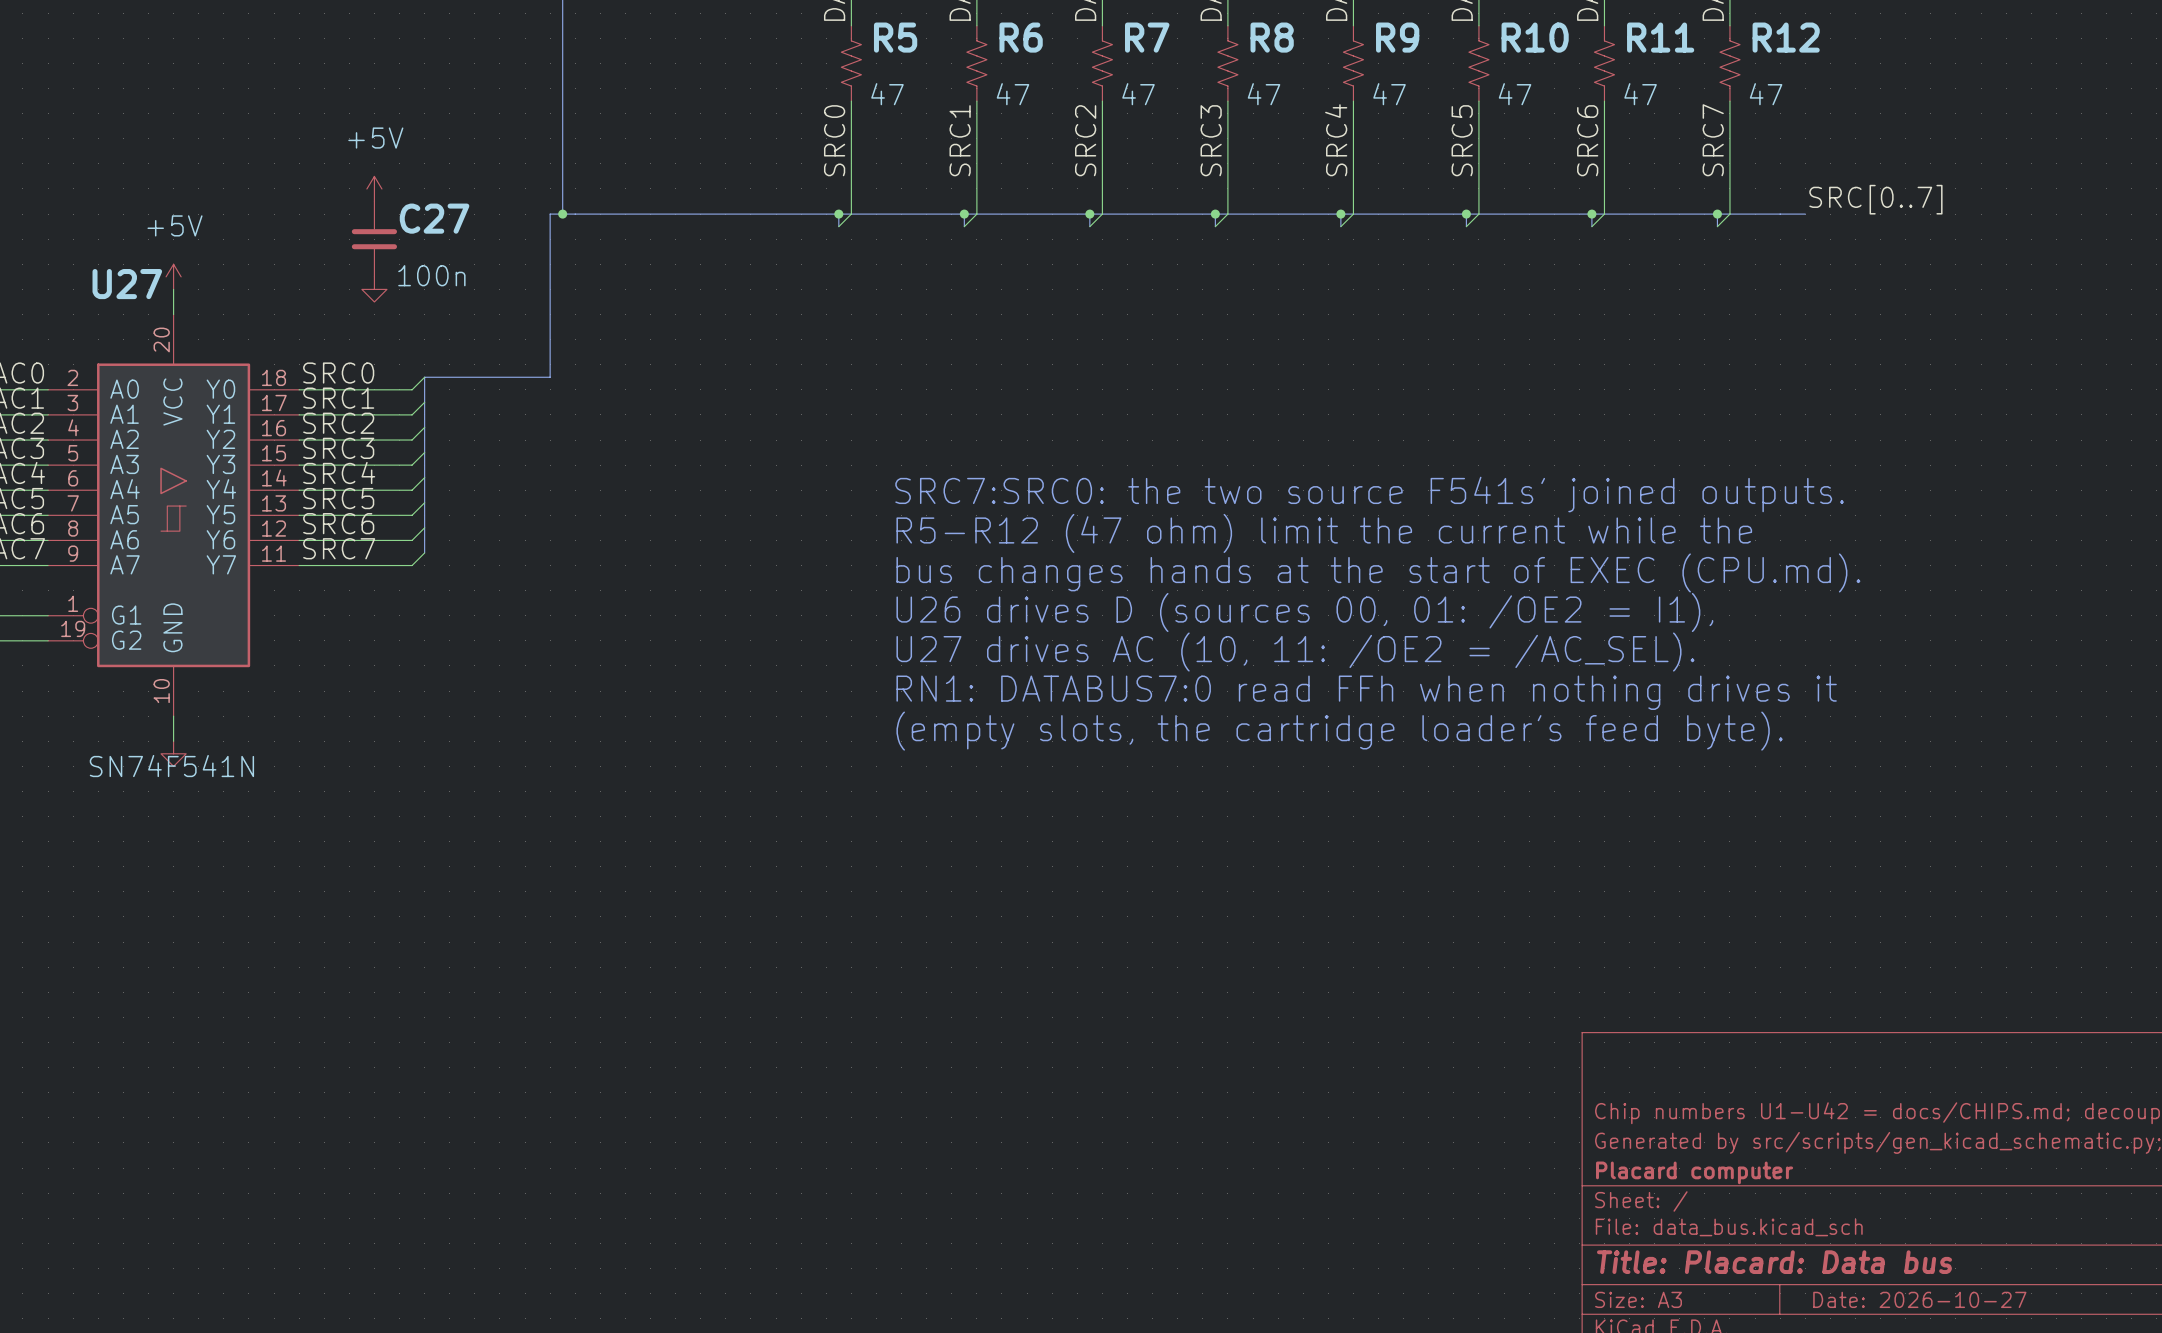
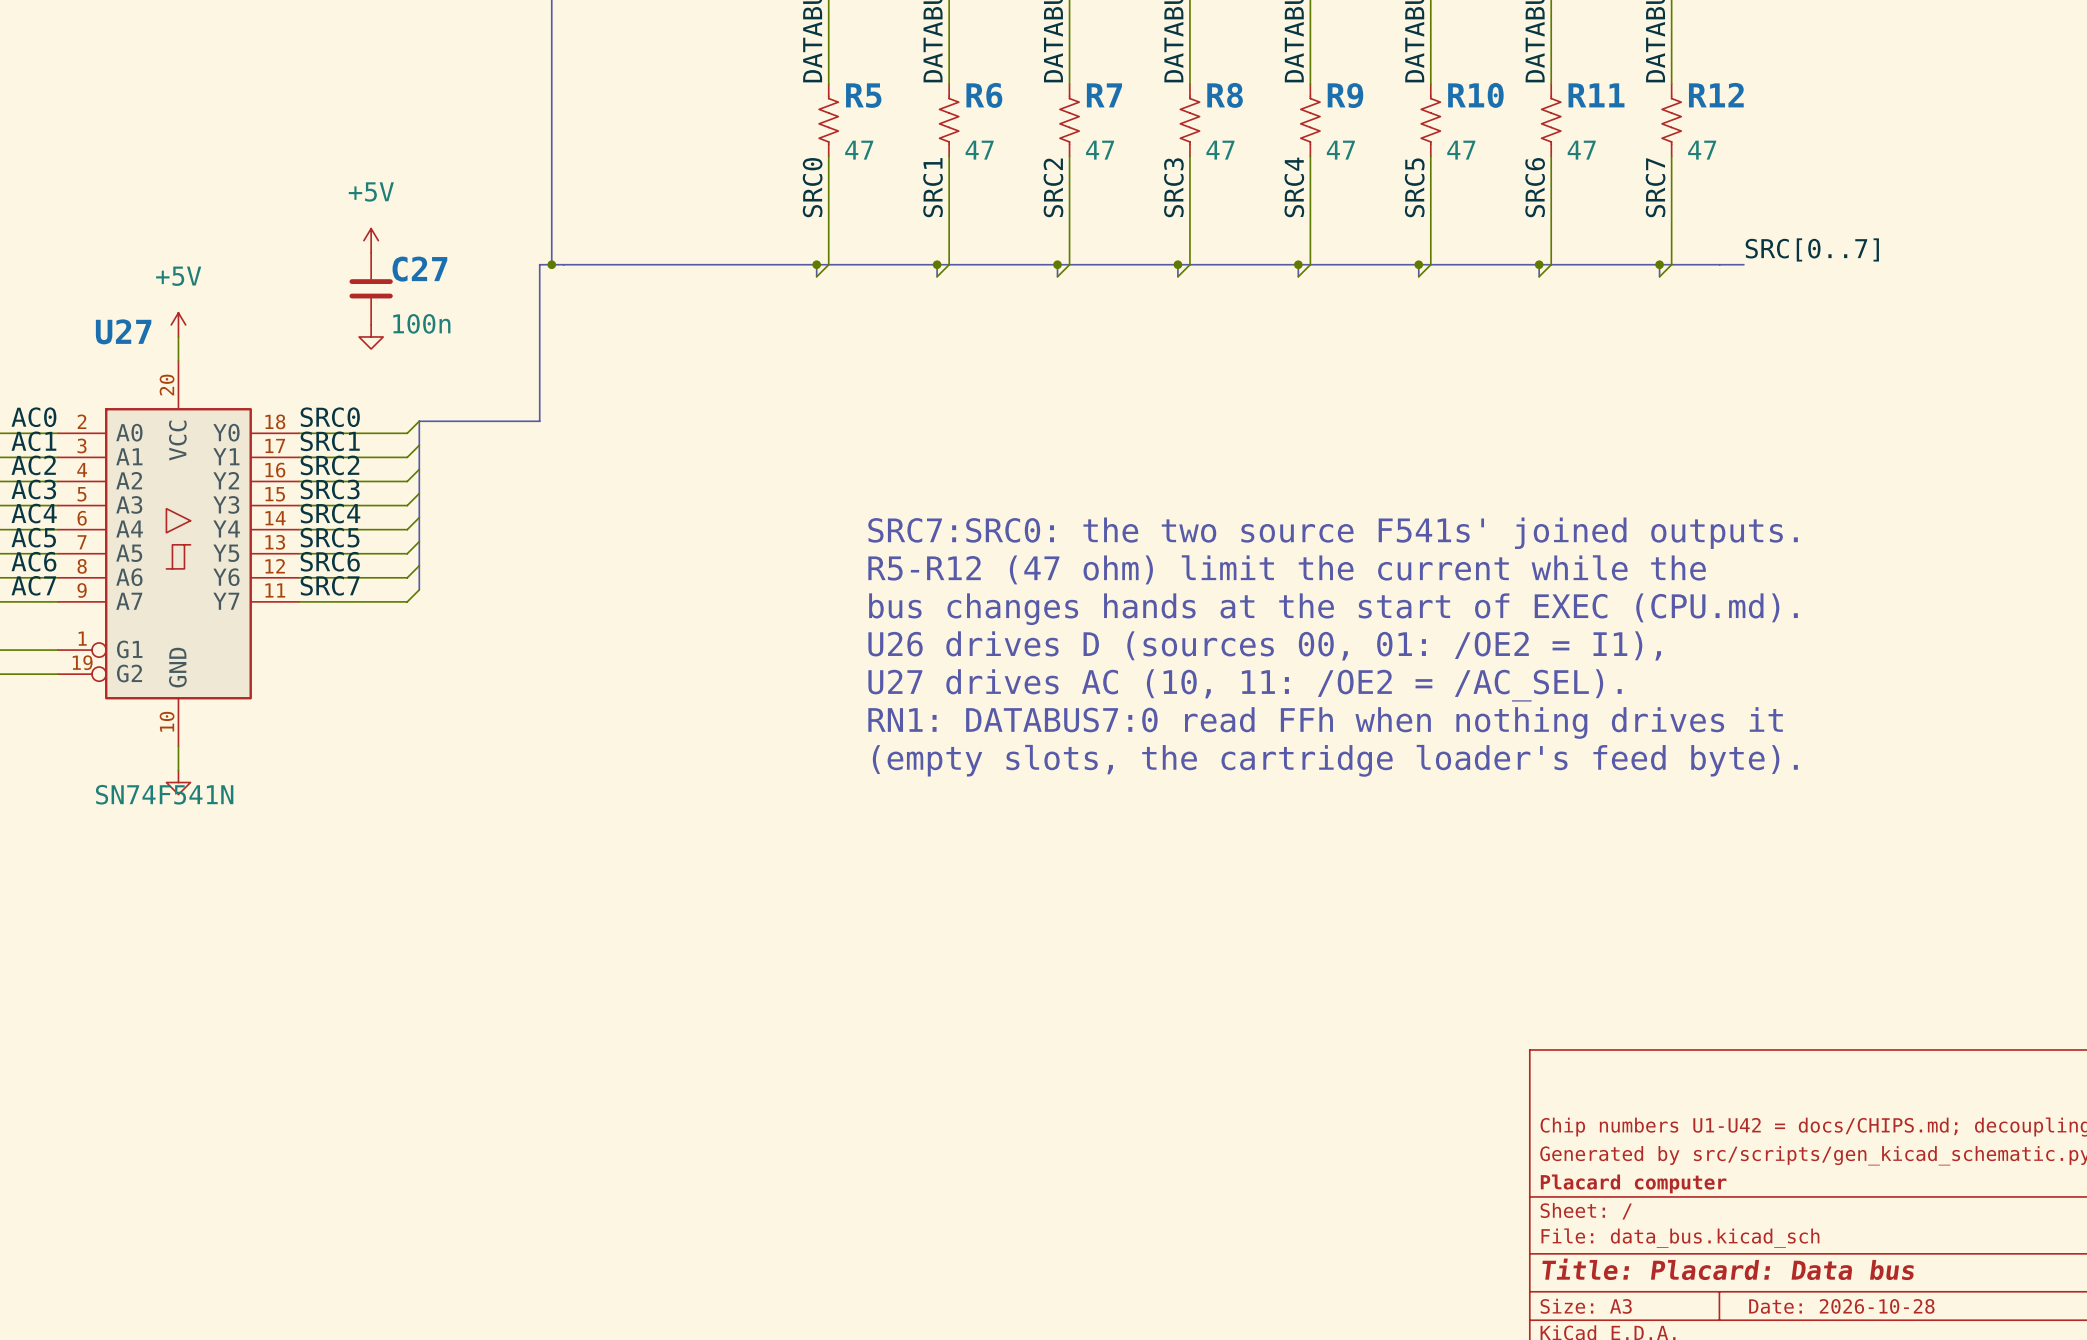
title block: Date: 2026-10-27 (1919, 1299) -> Date: 2026-10-28 (1841, 1306)

